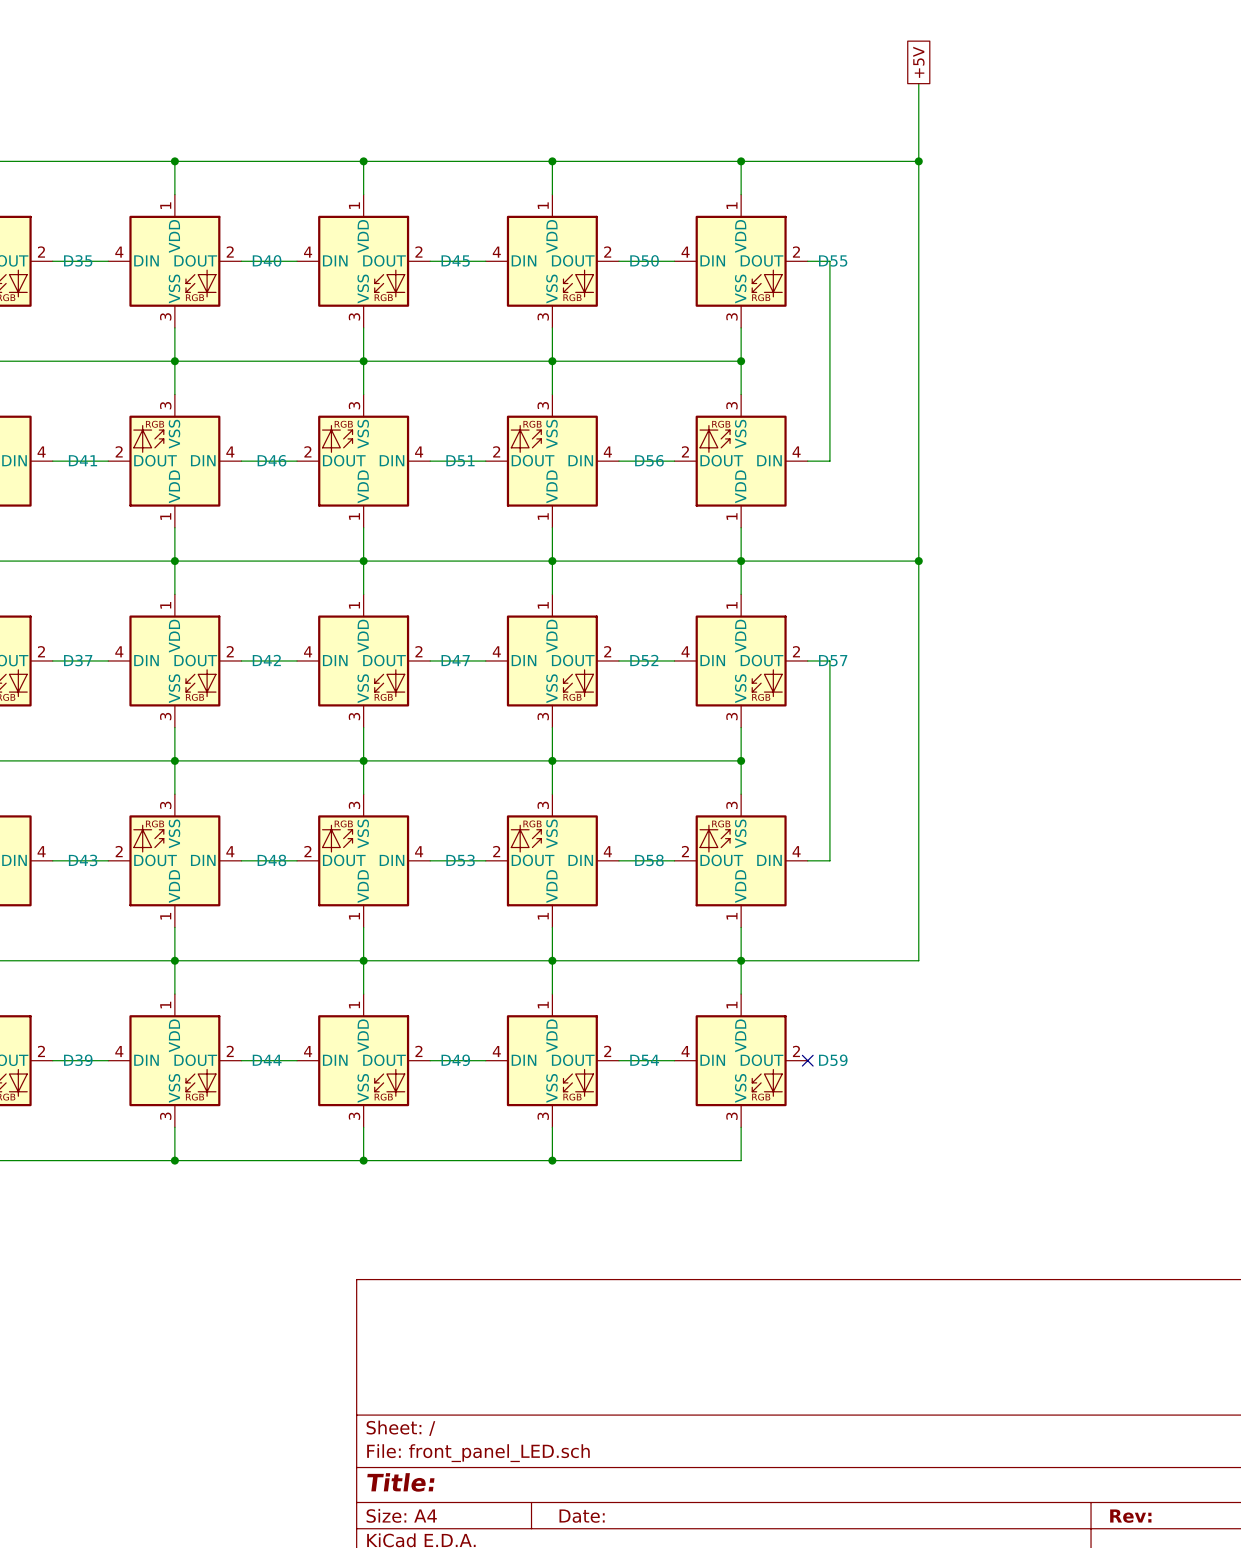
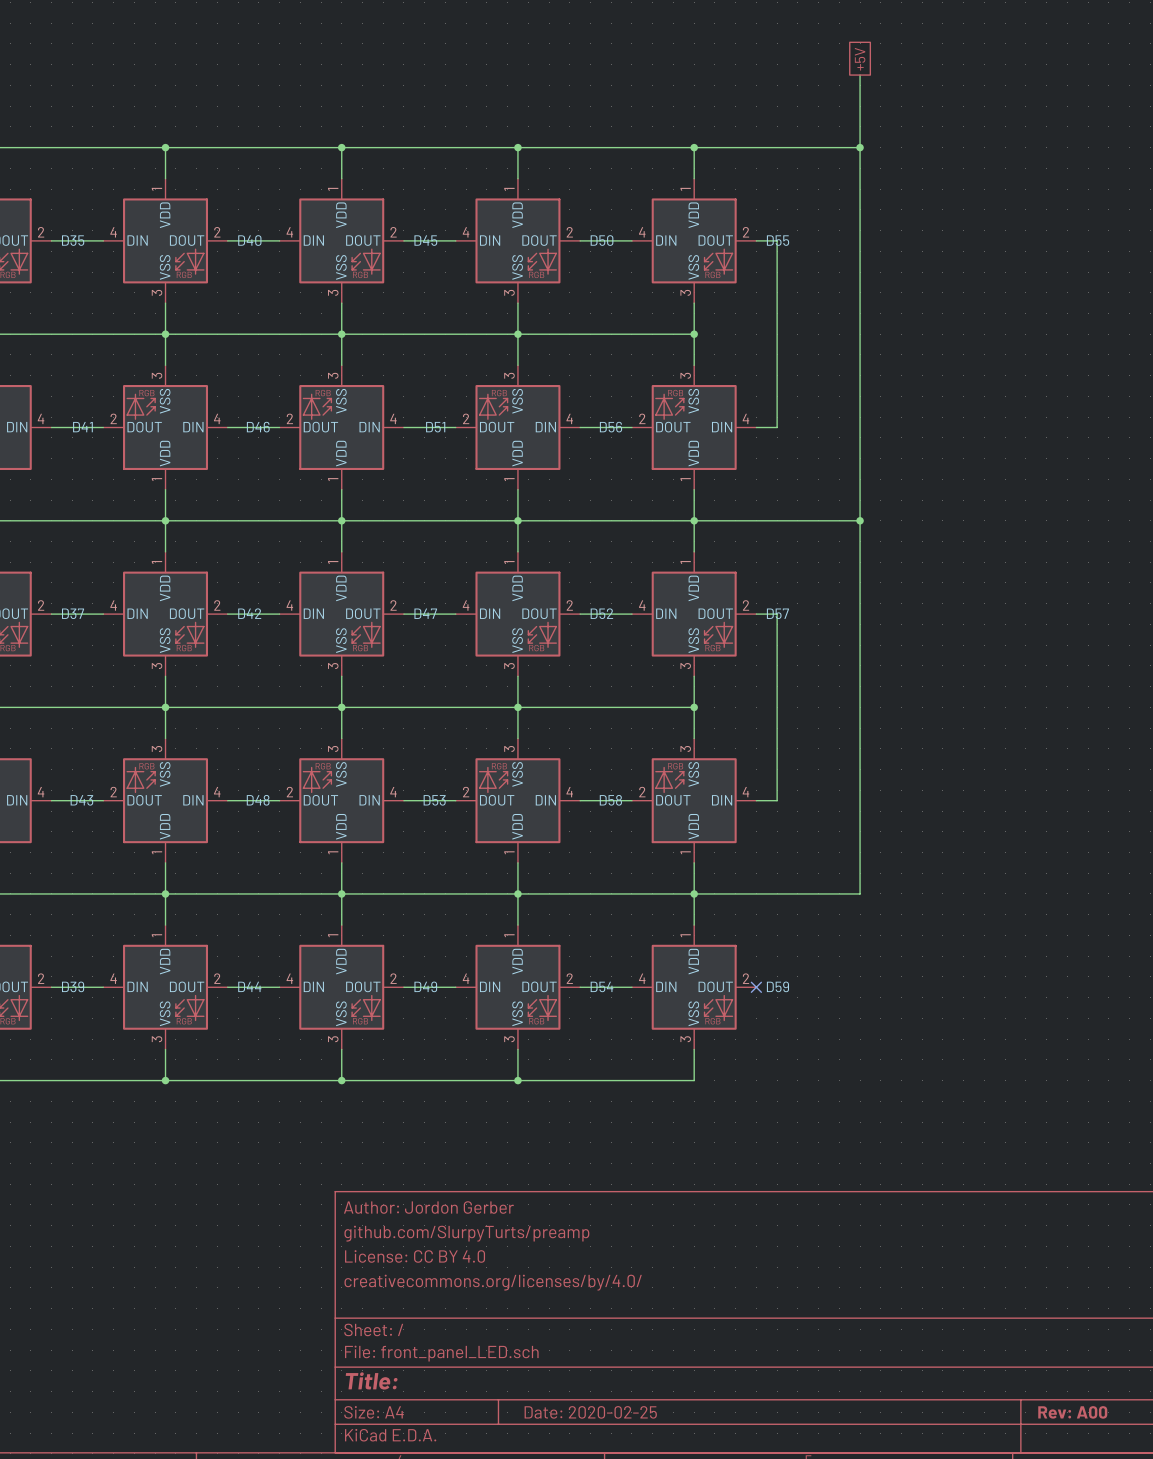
title block: none -> Author: Jordon Gerber (428, 1207)
title block: none -> github.com/SlurpyTurts/preamp (466, 1233)
title block: none -> License: CC BY 4.0 (415, 1256)
title block: none -> creativecommons.org/licenses/by/4.0/ (493, 1282)
title block: Date: (582, 1516) -> Date: 2020-02-25 (590, 1412)
title block: Rev: (1130, 1516) -> Rev: A00 (1072, 1412)

